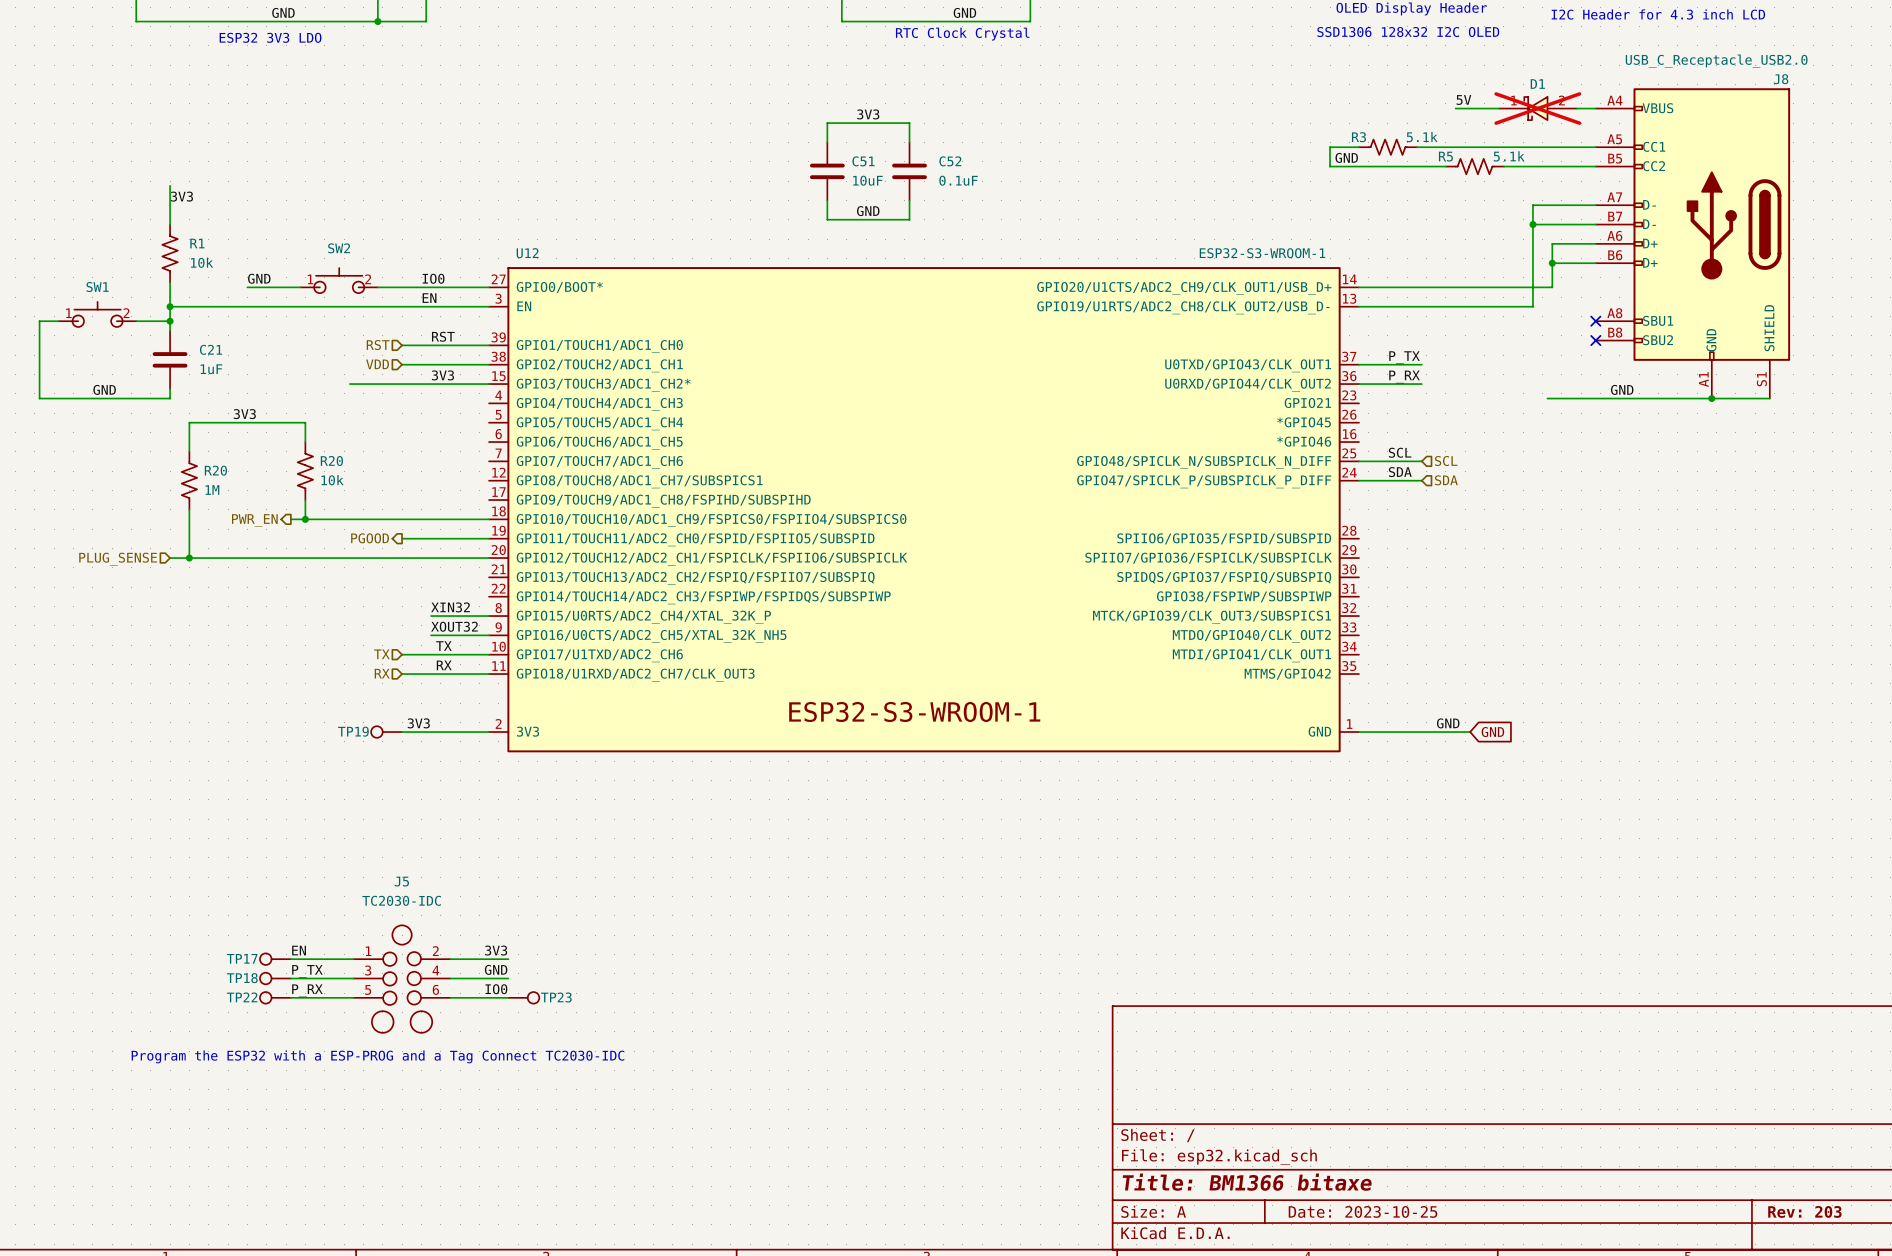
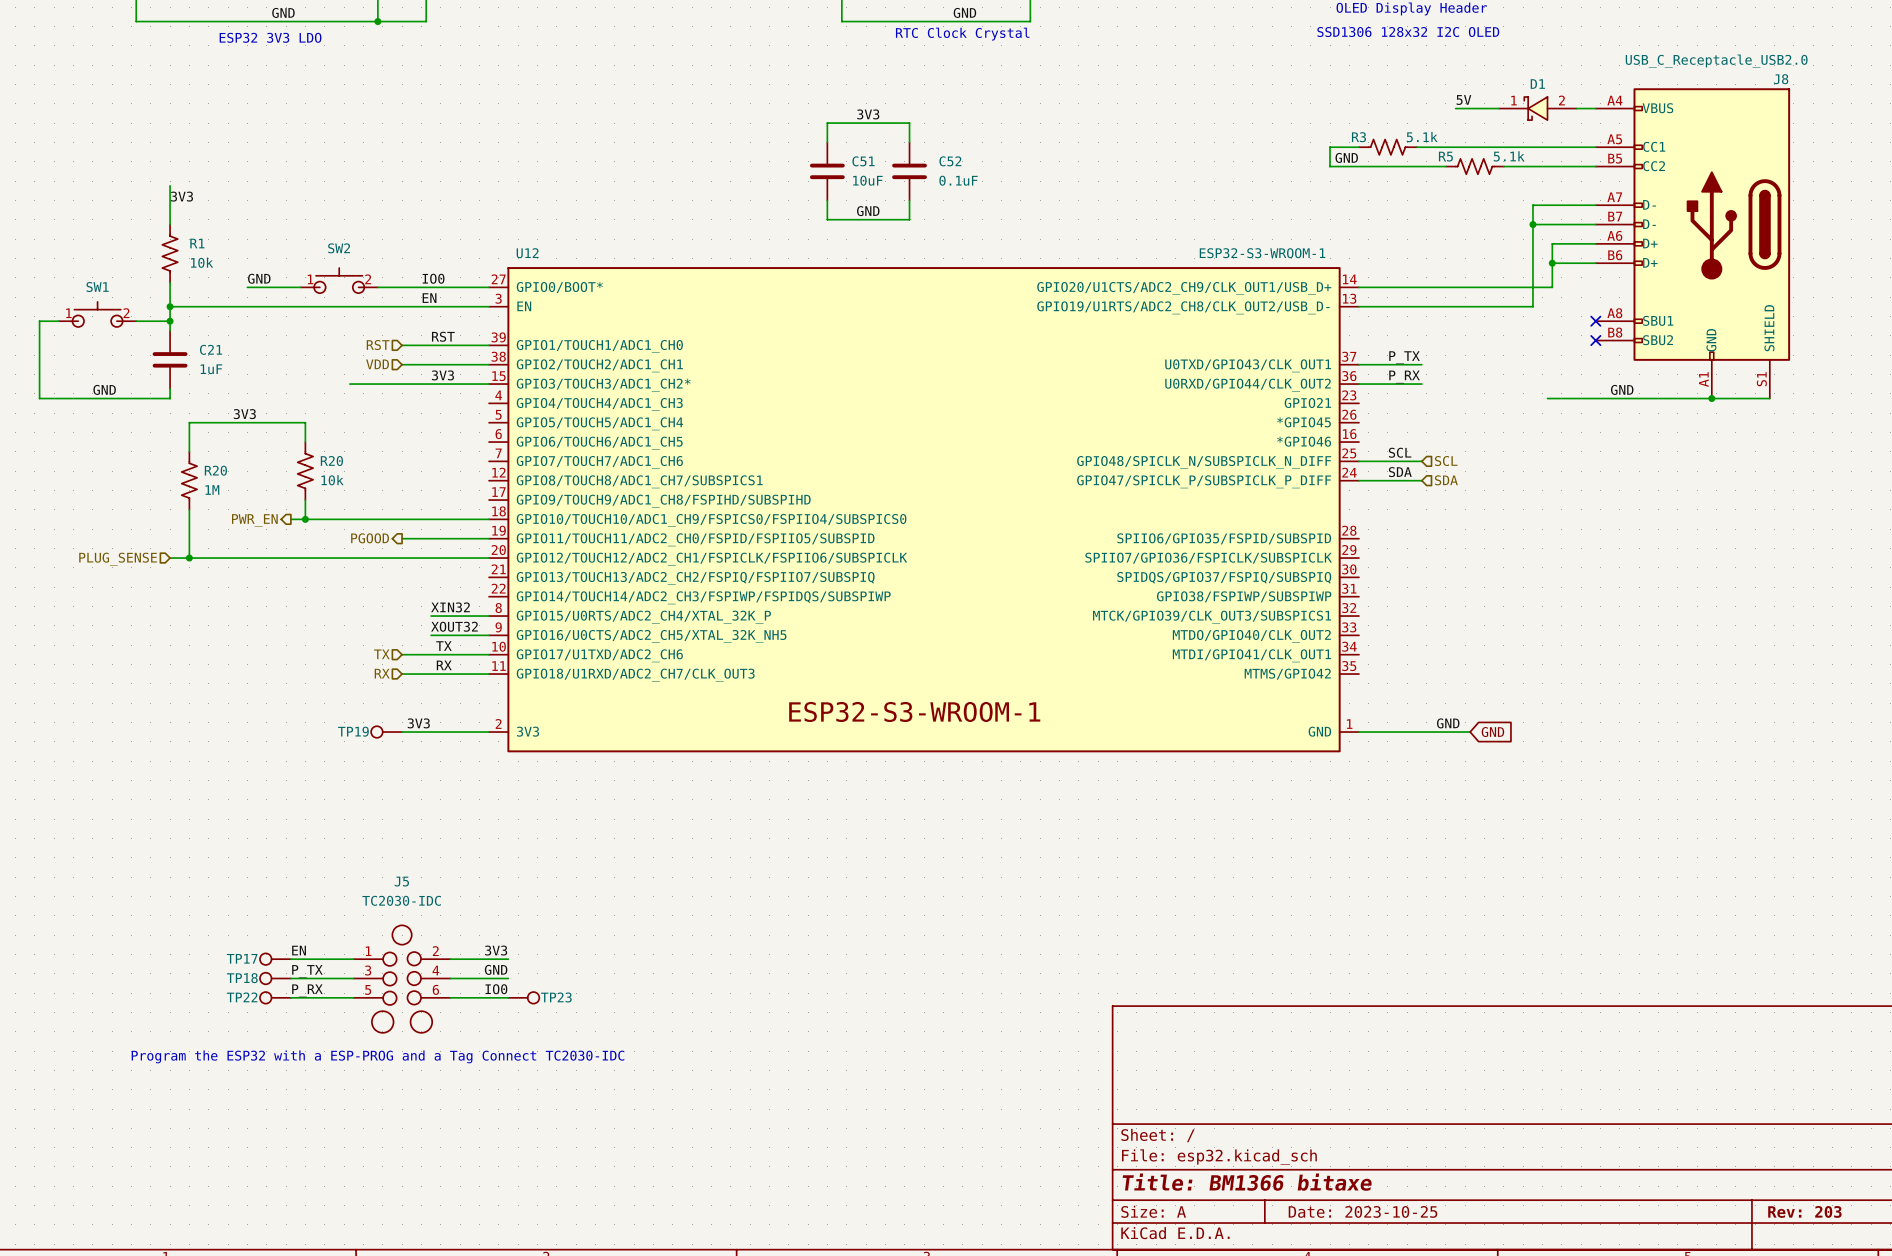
text: I2C Header for 4.3 inch LCD (1658, 14) -> none
D1 do-not-place cross: (1537, 108) -> none

